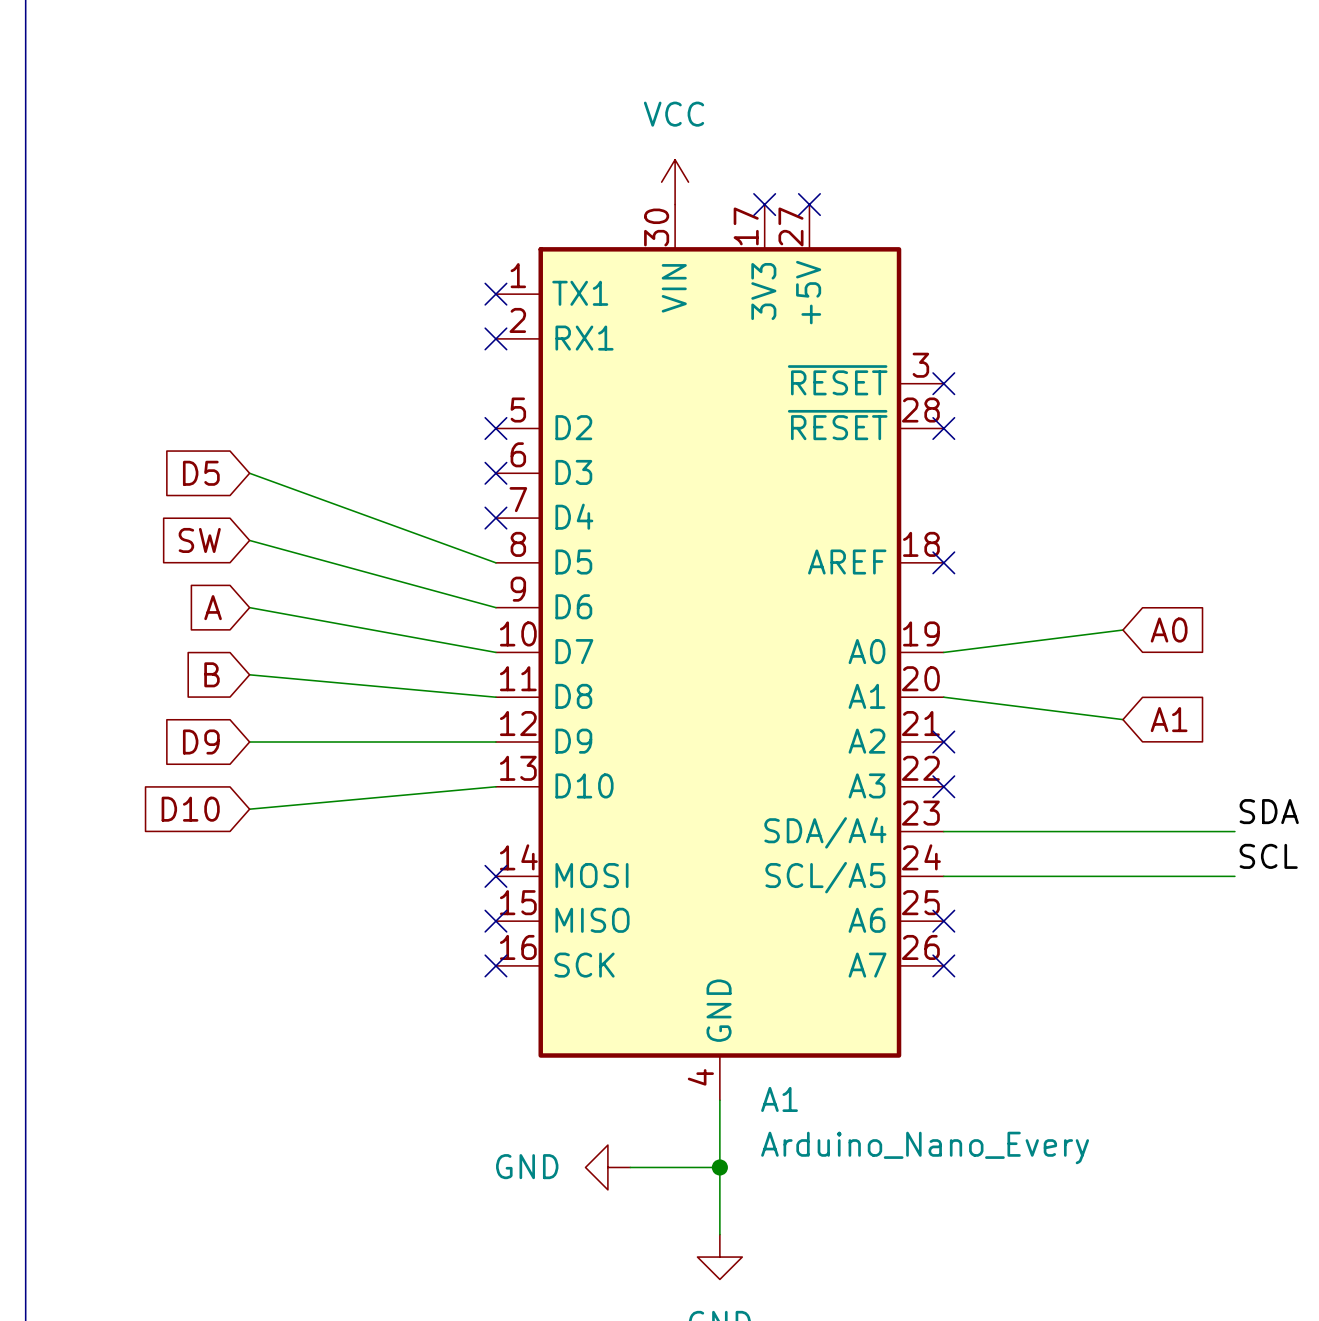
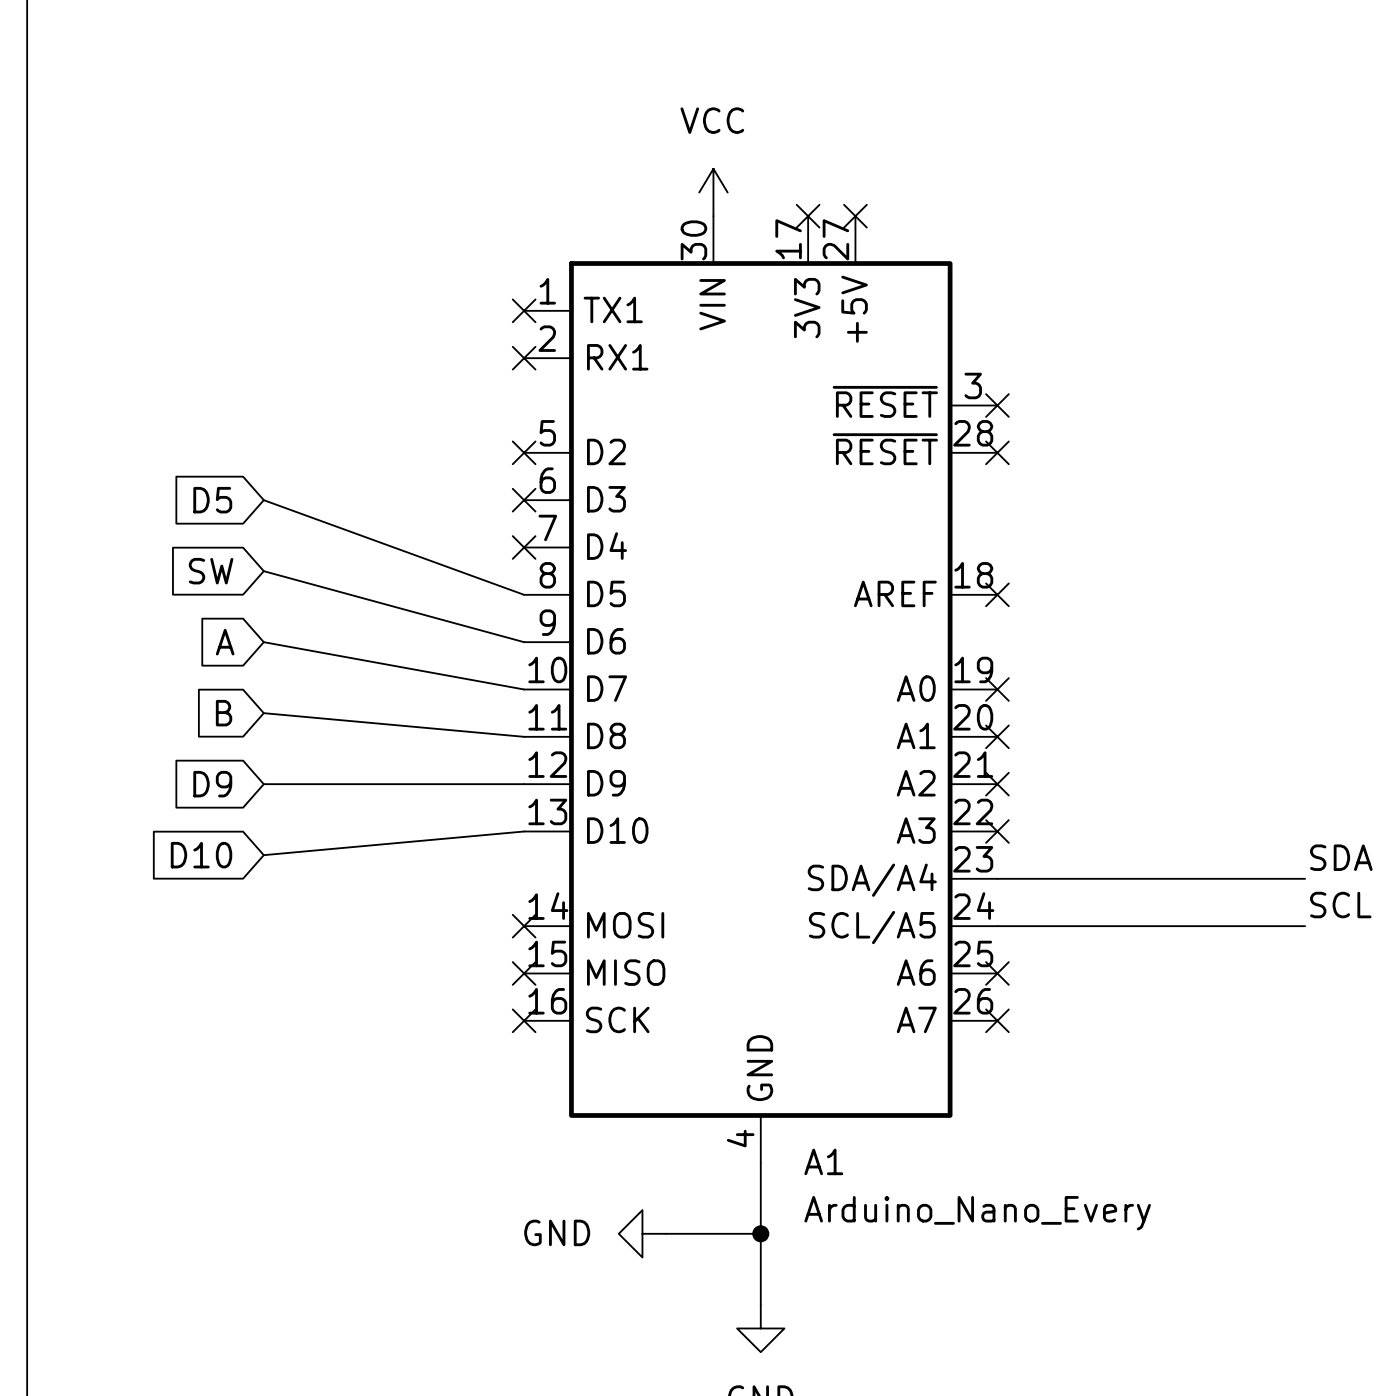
wire: (1122, 630) (943, 652) -> none
global label: A0 (1169, 630) -> none
no-connect mark: none -> (997, 689)
wire: (943, 697) (1122, 719) -> none
no-connect mark: none -> (997, 736)
global label: A1 (1169, 719) -> none

